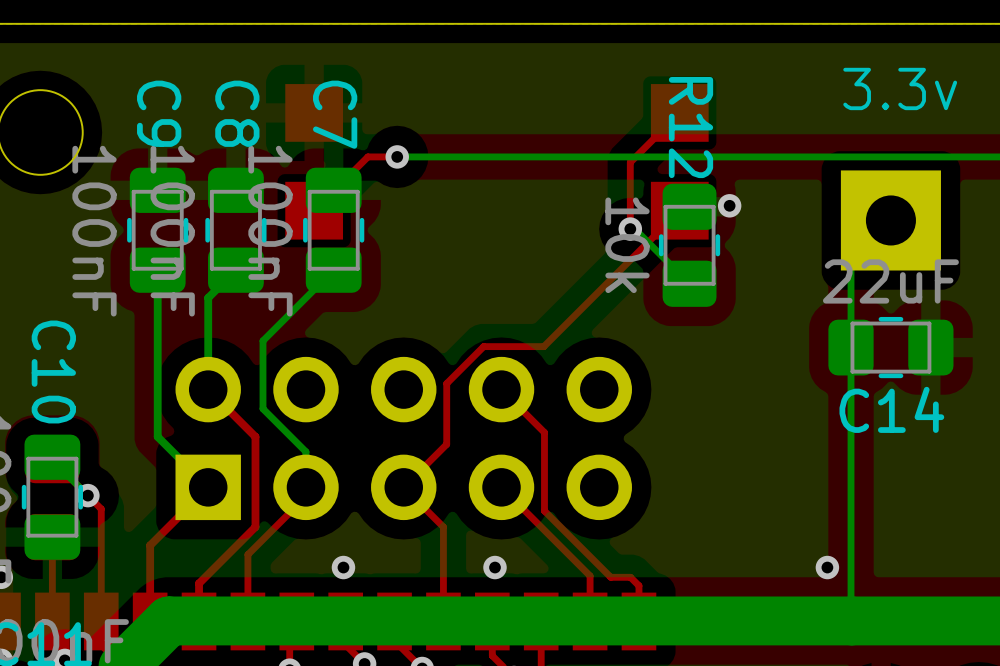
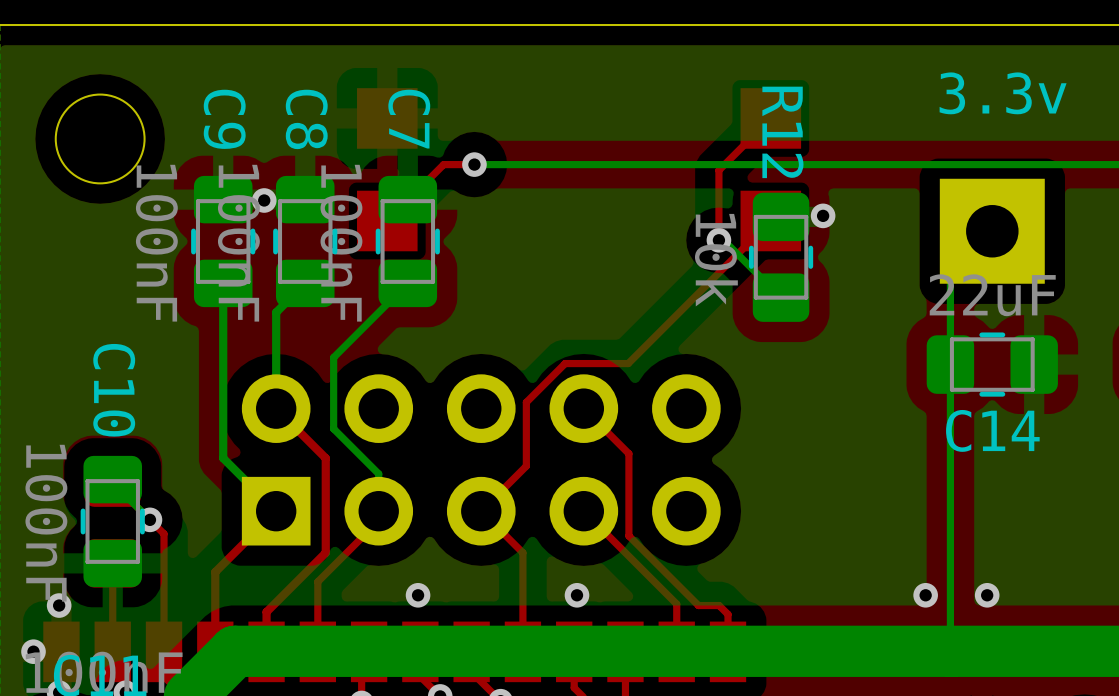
via: none -> (264, 200)
via: none -> (987, 595)

